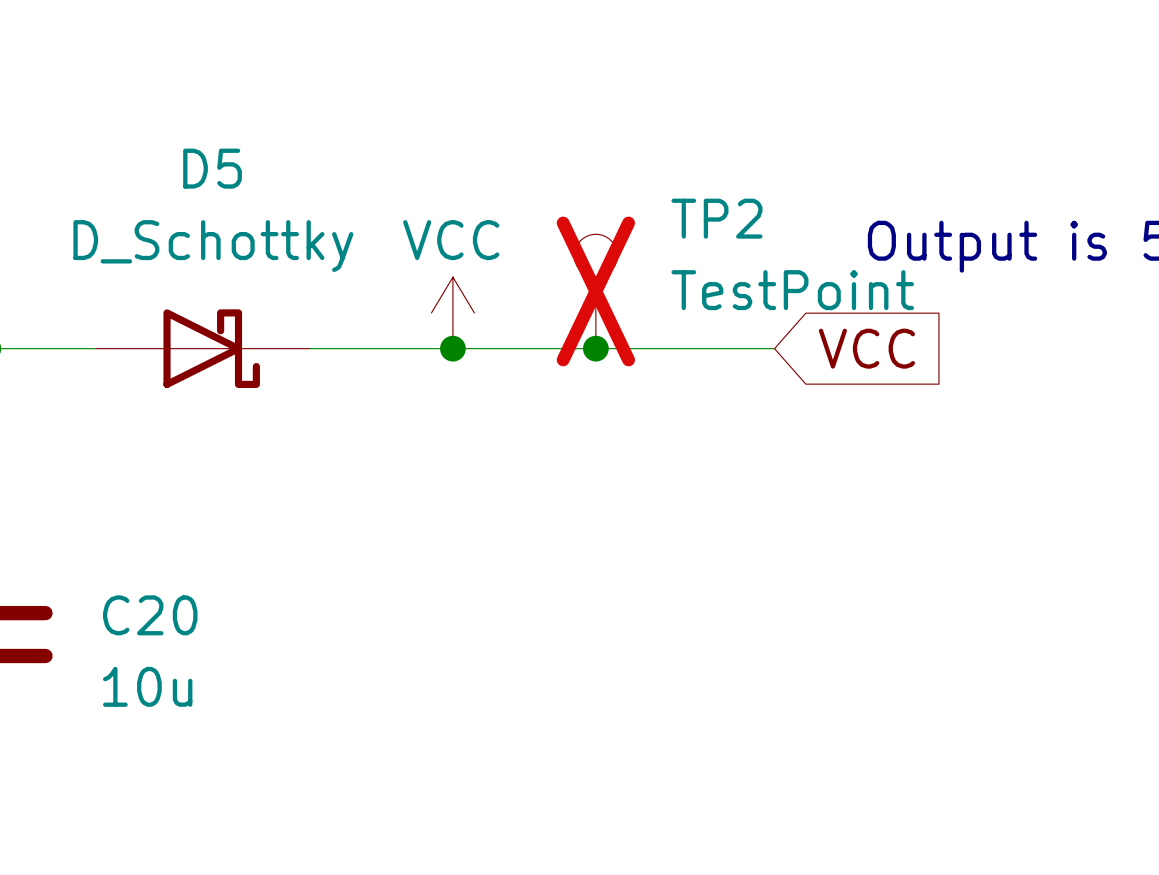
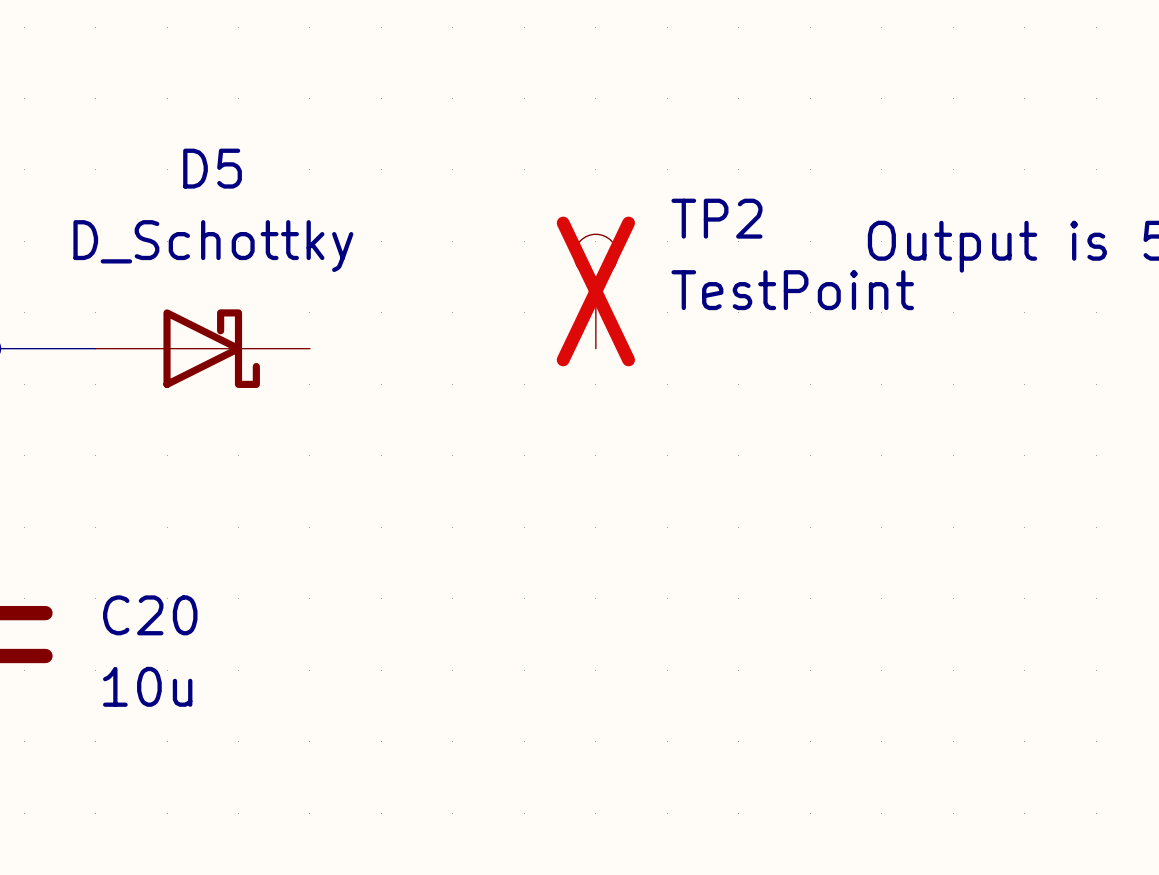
power symbol: VCC (452, 312) -> none
wire: (309, 348) (774, 348) -> none
junction: (452, 348) -> none
junction: (595, 348) -> none
global label: VCC (866, 348) -> none

